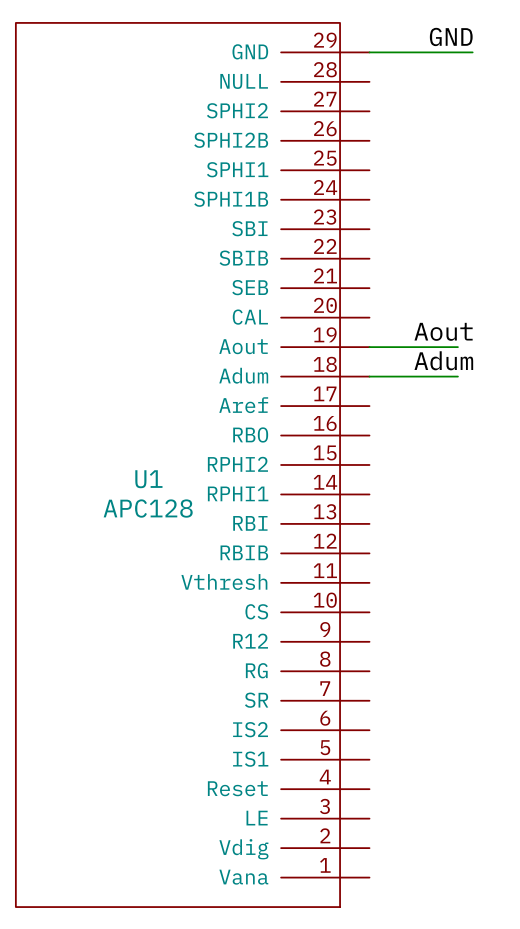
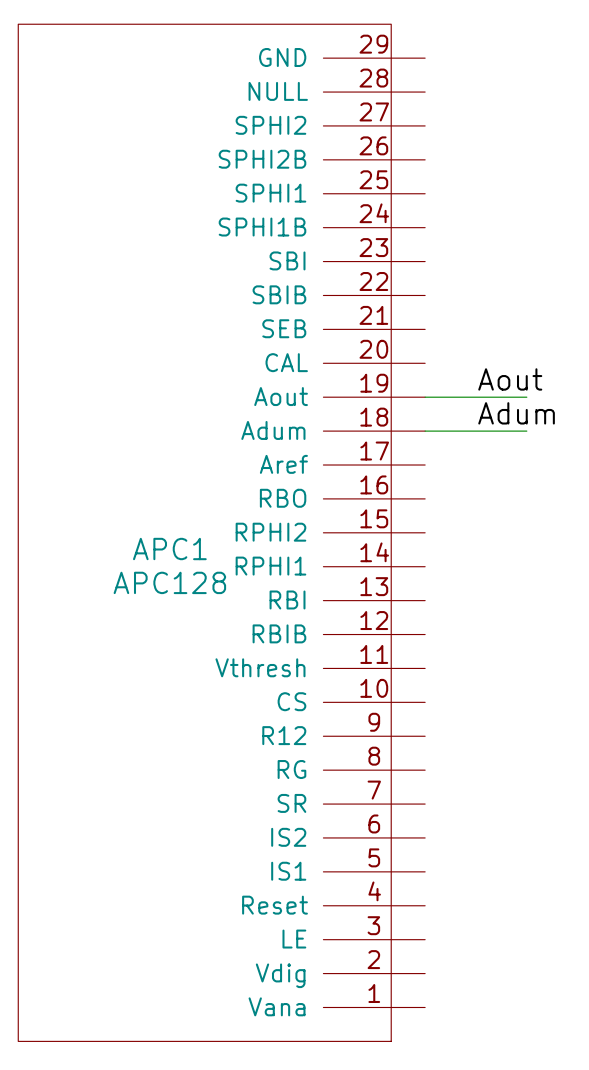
label: GND (451, 36) -> none
wire: (369, 52) (472, 52) -> none
U1 name: U1 (148, 479) -> APC1 (169, 549)

